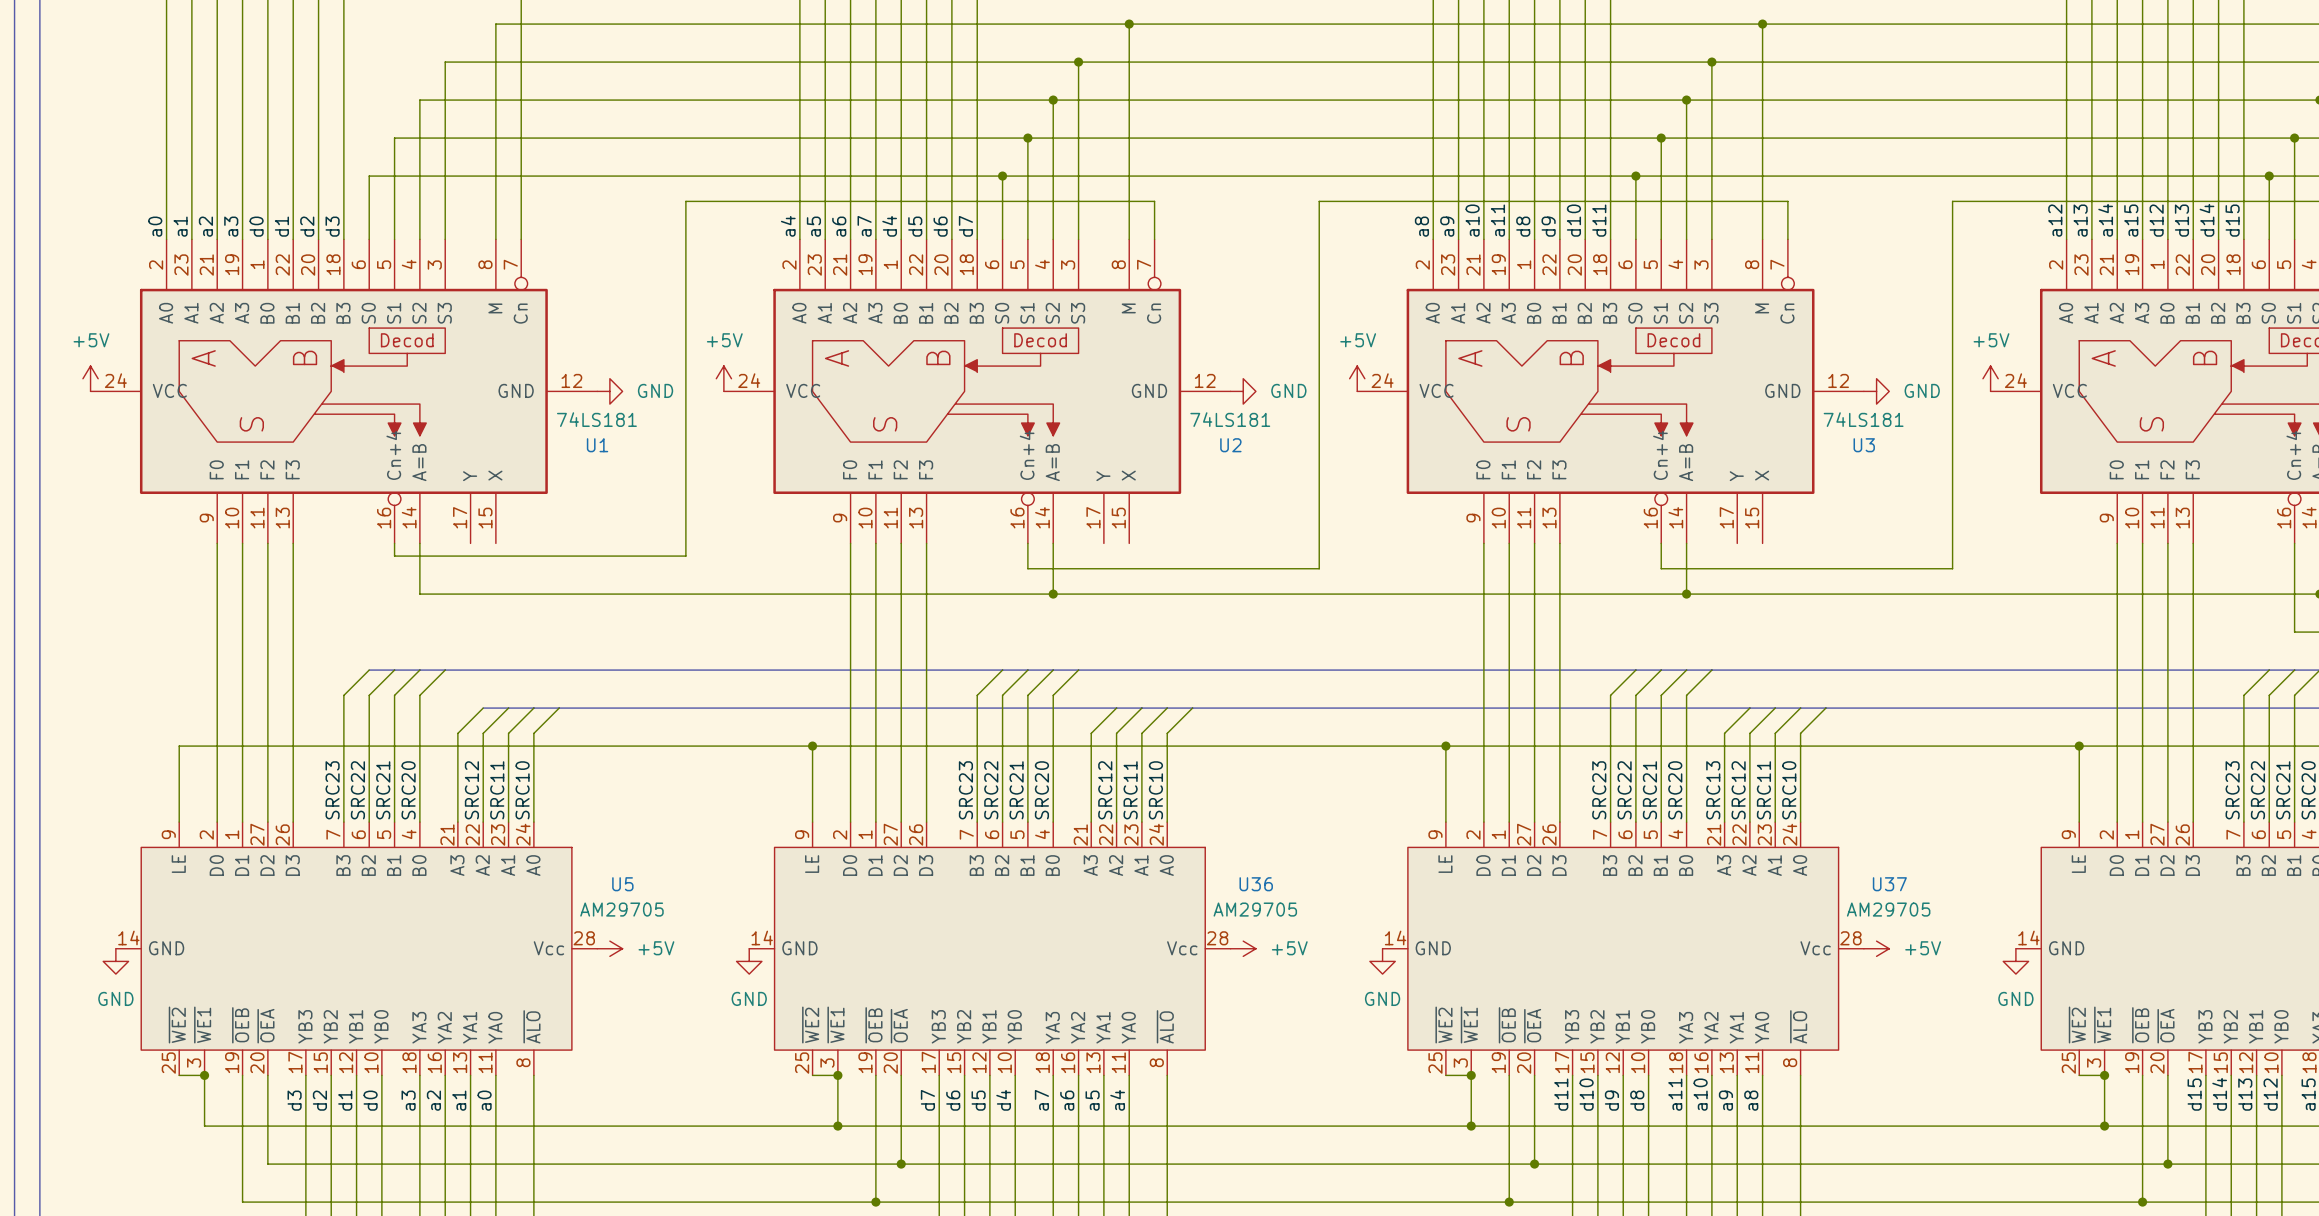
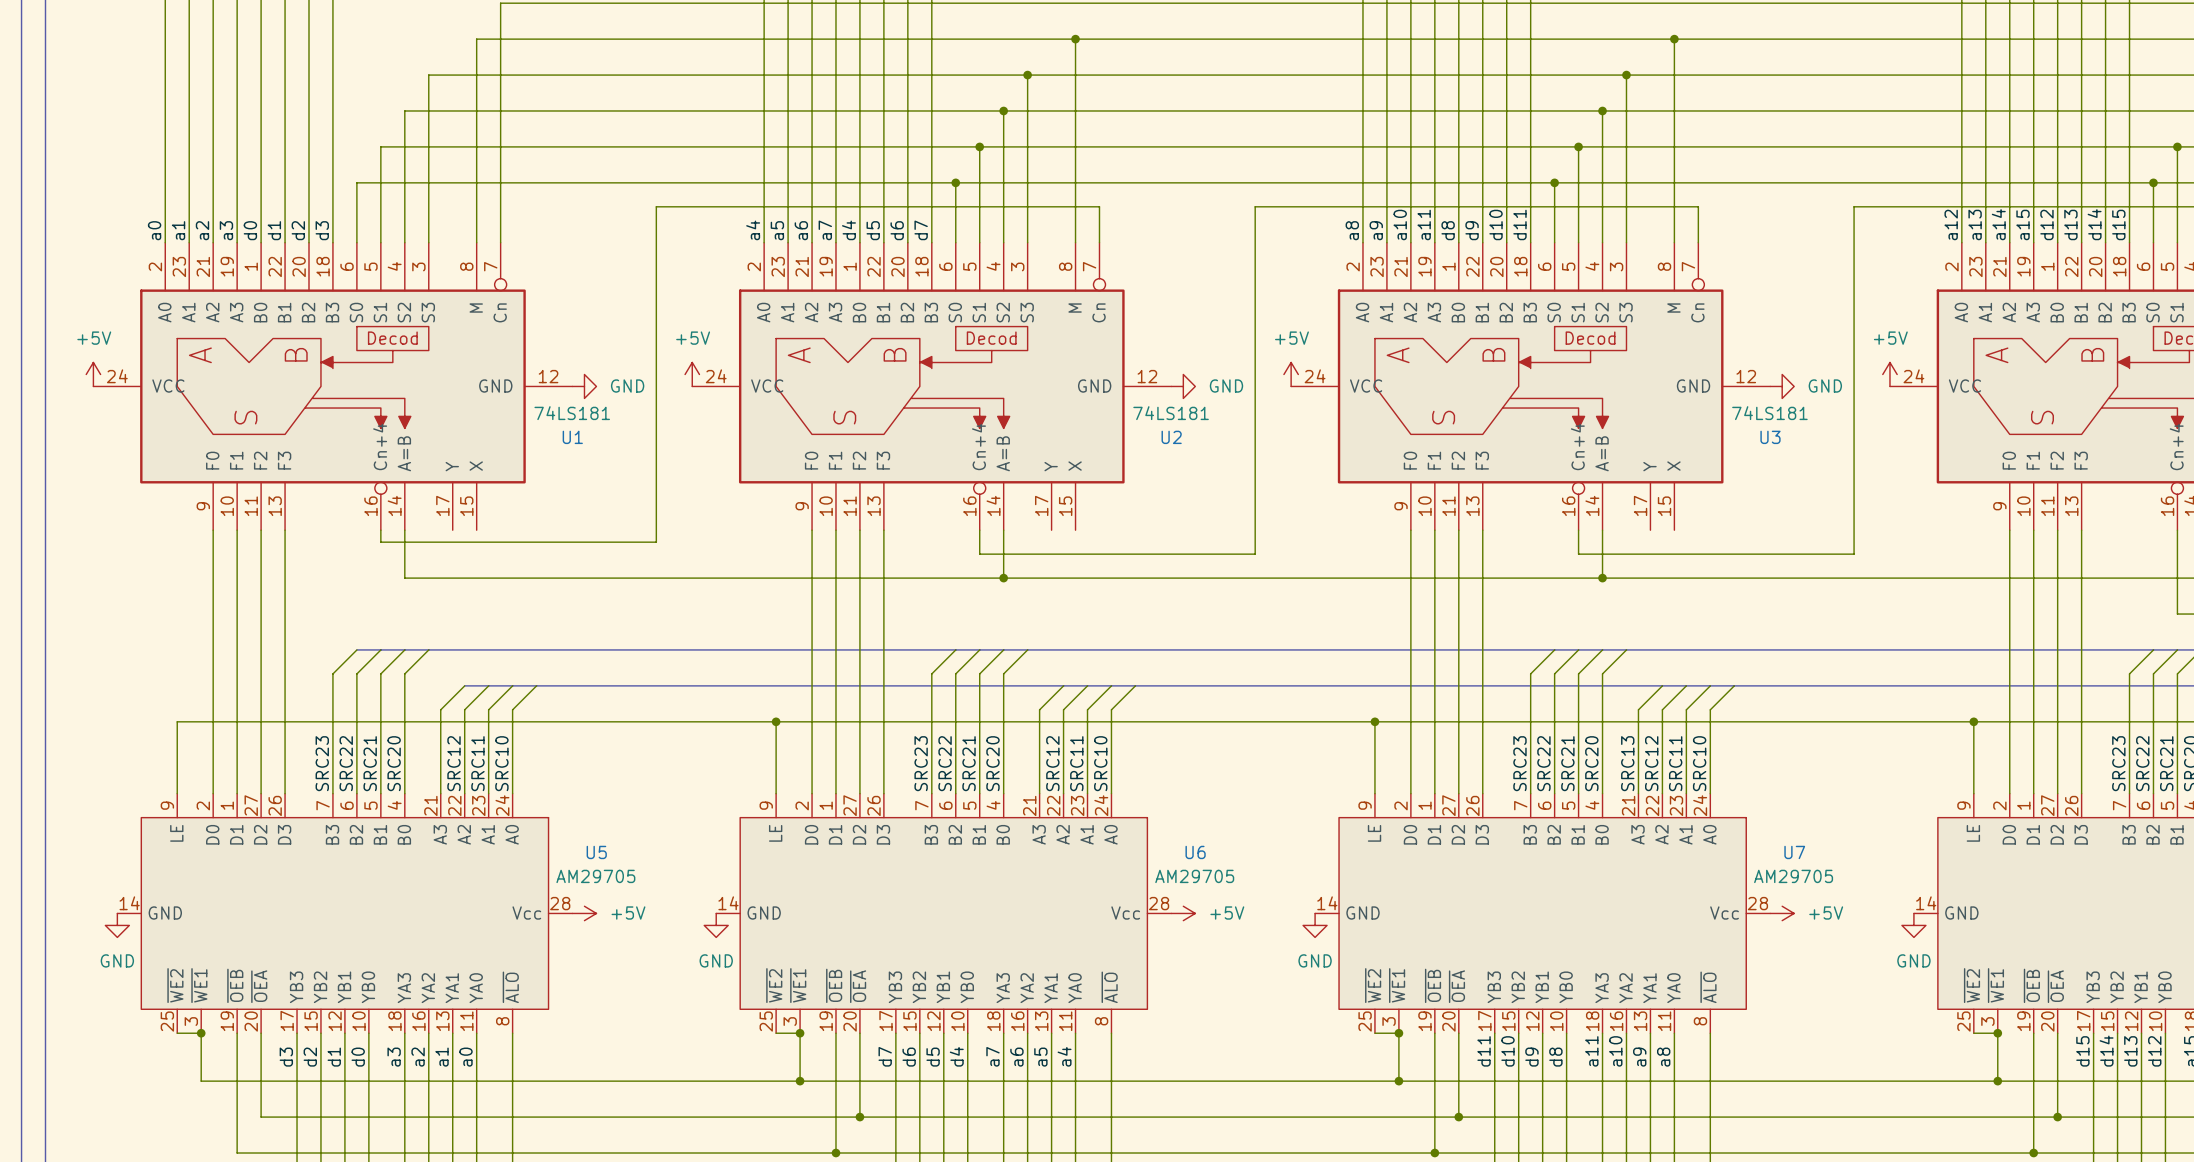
U36 name: U36 (1256, 884) -> U6 (1195, 852)
U37 name: U37 (1889, 884) -> U7 (1794, 852)

